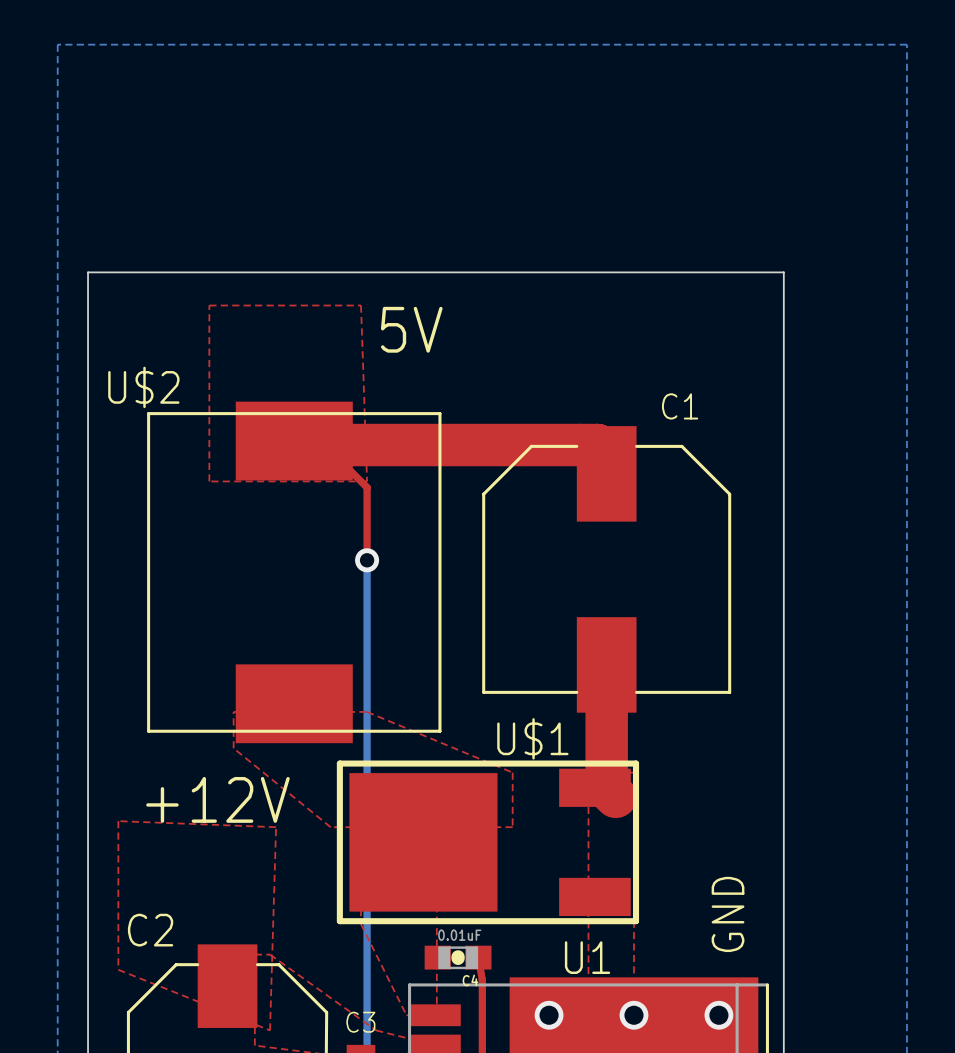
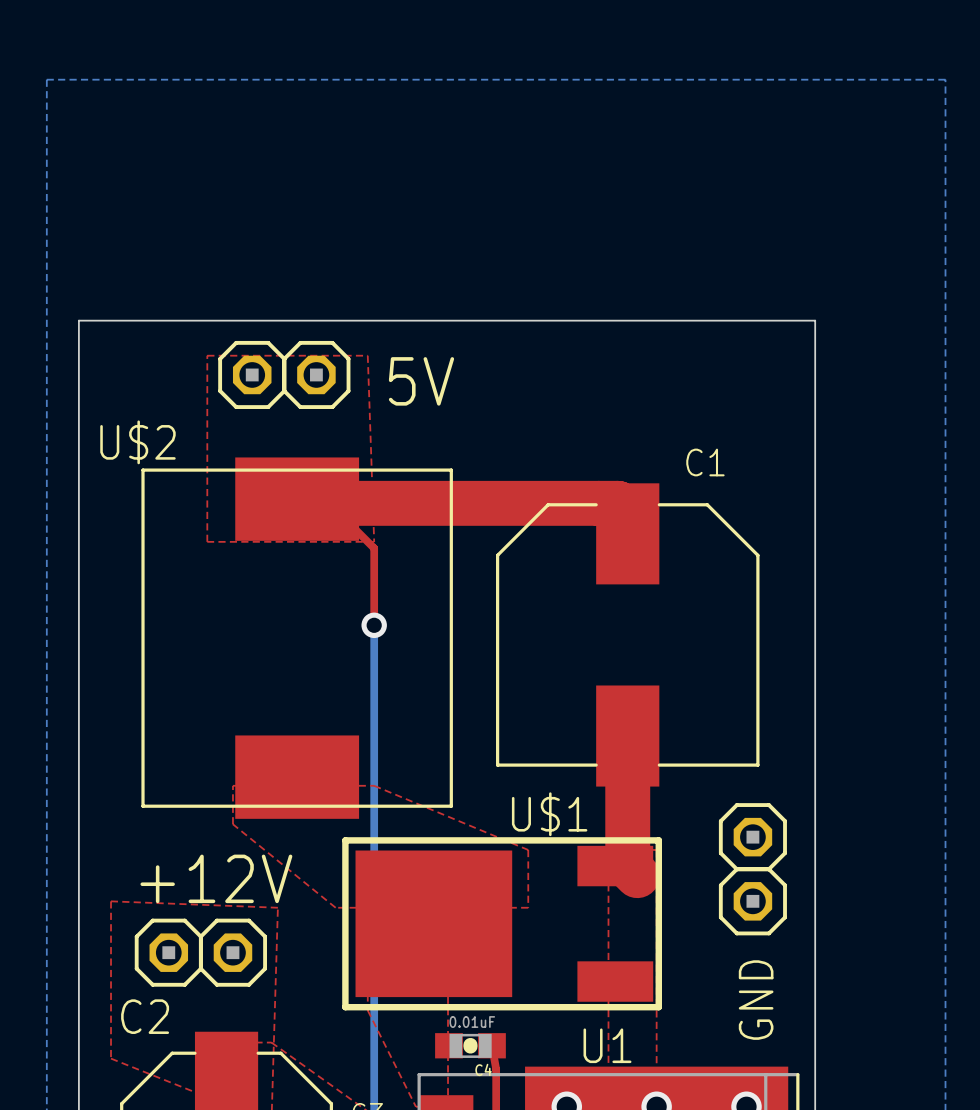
part: none -> (252, 374)
part: none -> (316, 374)
part: none -> (752, 837)
part: none -> (752, 901)
part: none -> (168, 952)
part: none -> (232, 952)

